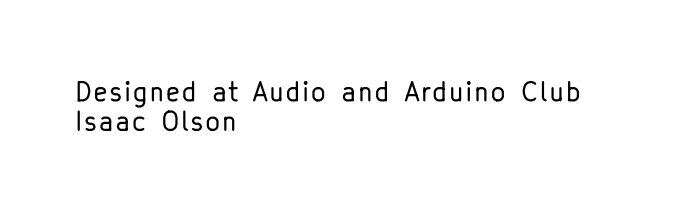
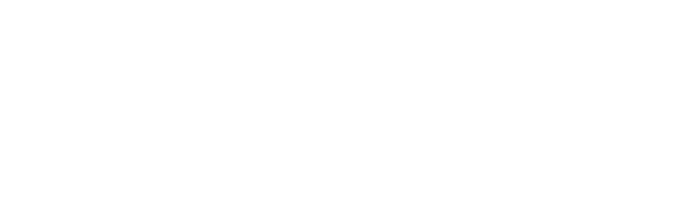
text: Designed at Audio and Arduino Club (328, 94) -> none
text: Isaac Olson (155, 120) -> none

